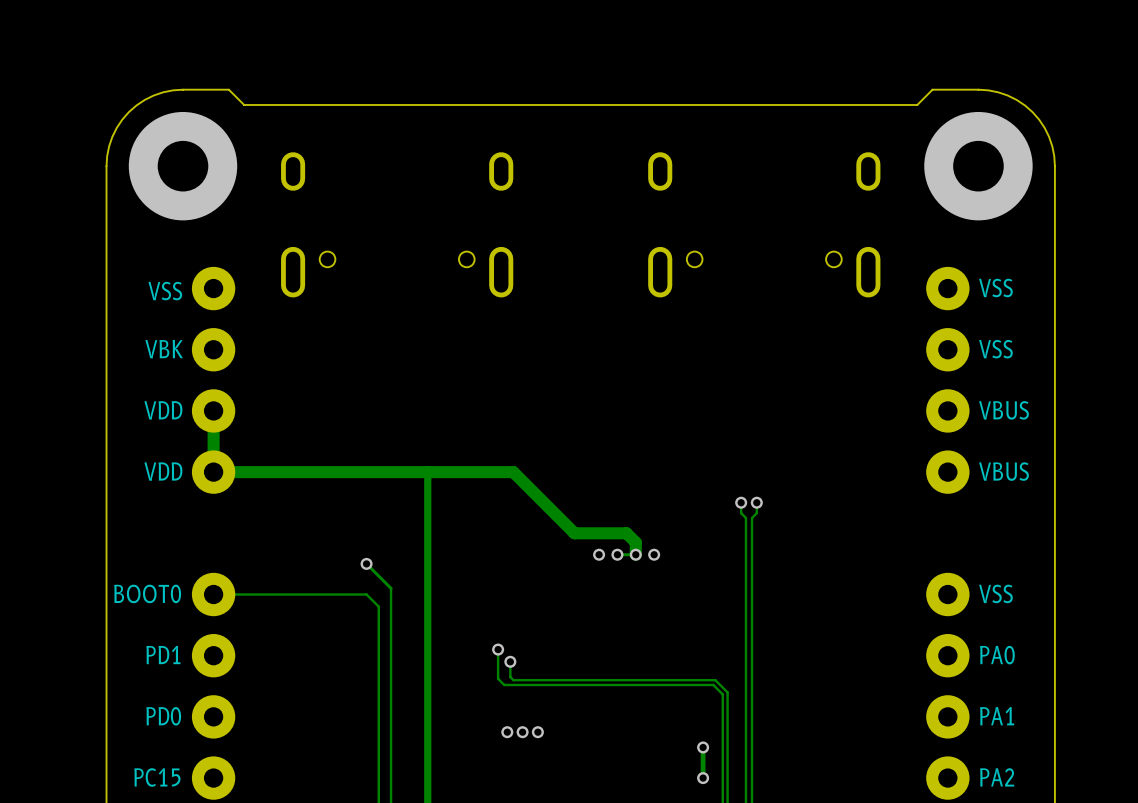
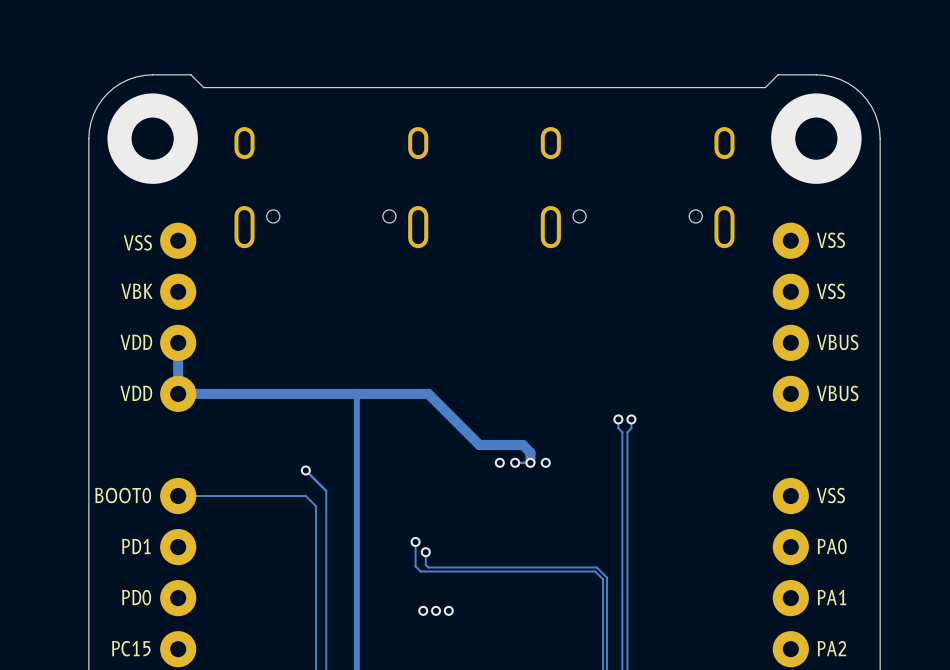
track: (703, 747) (703, 778) -> none
via: (703, 747) -> none
via: (703, 778) -> none

